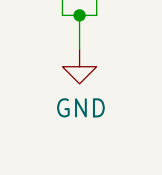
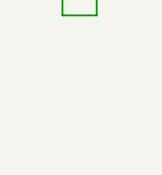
wire: (79, 15) (79, 49) -> none
junction: (79, 15) -> none
power symbol: GND (79, 66) -> none

